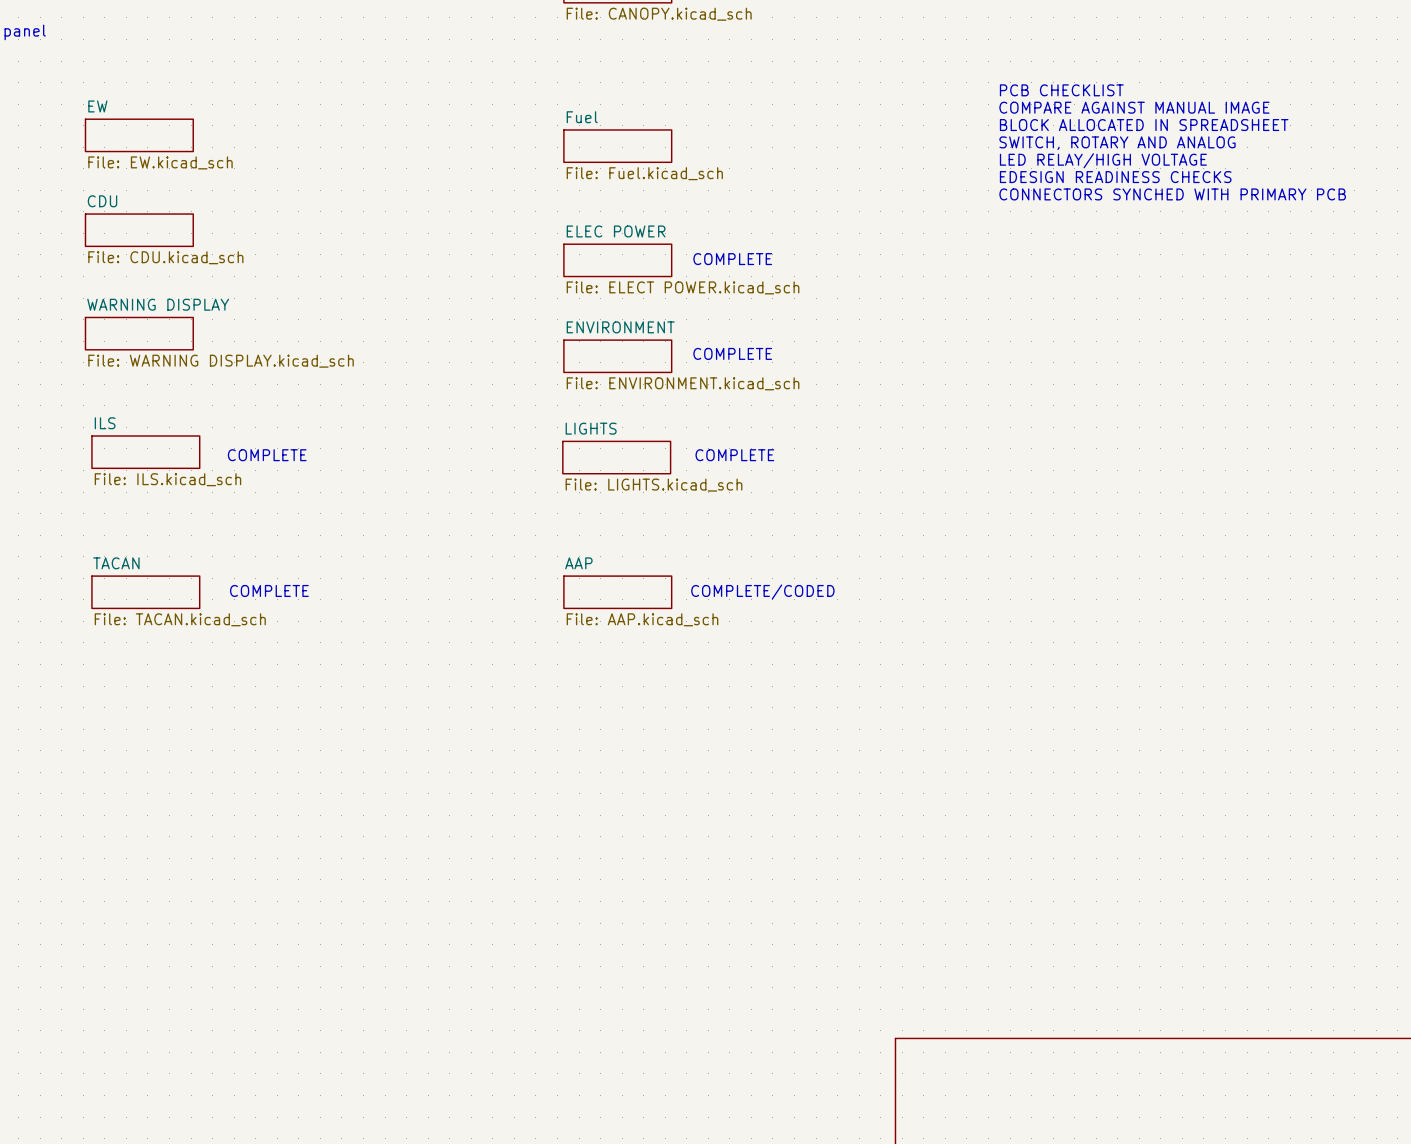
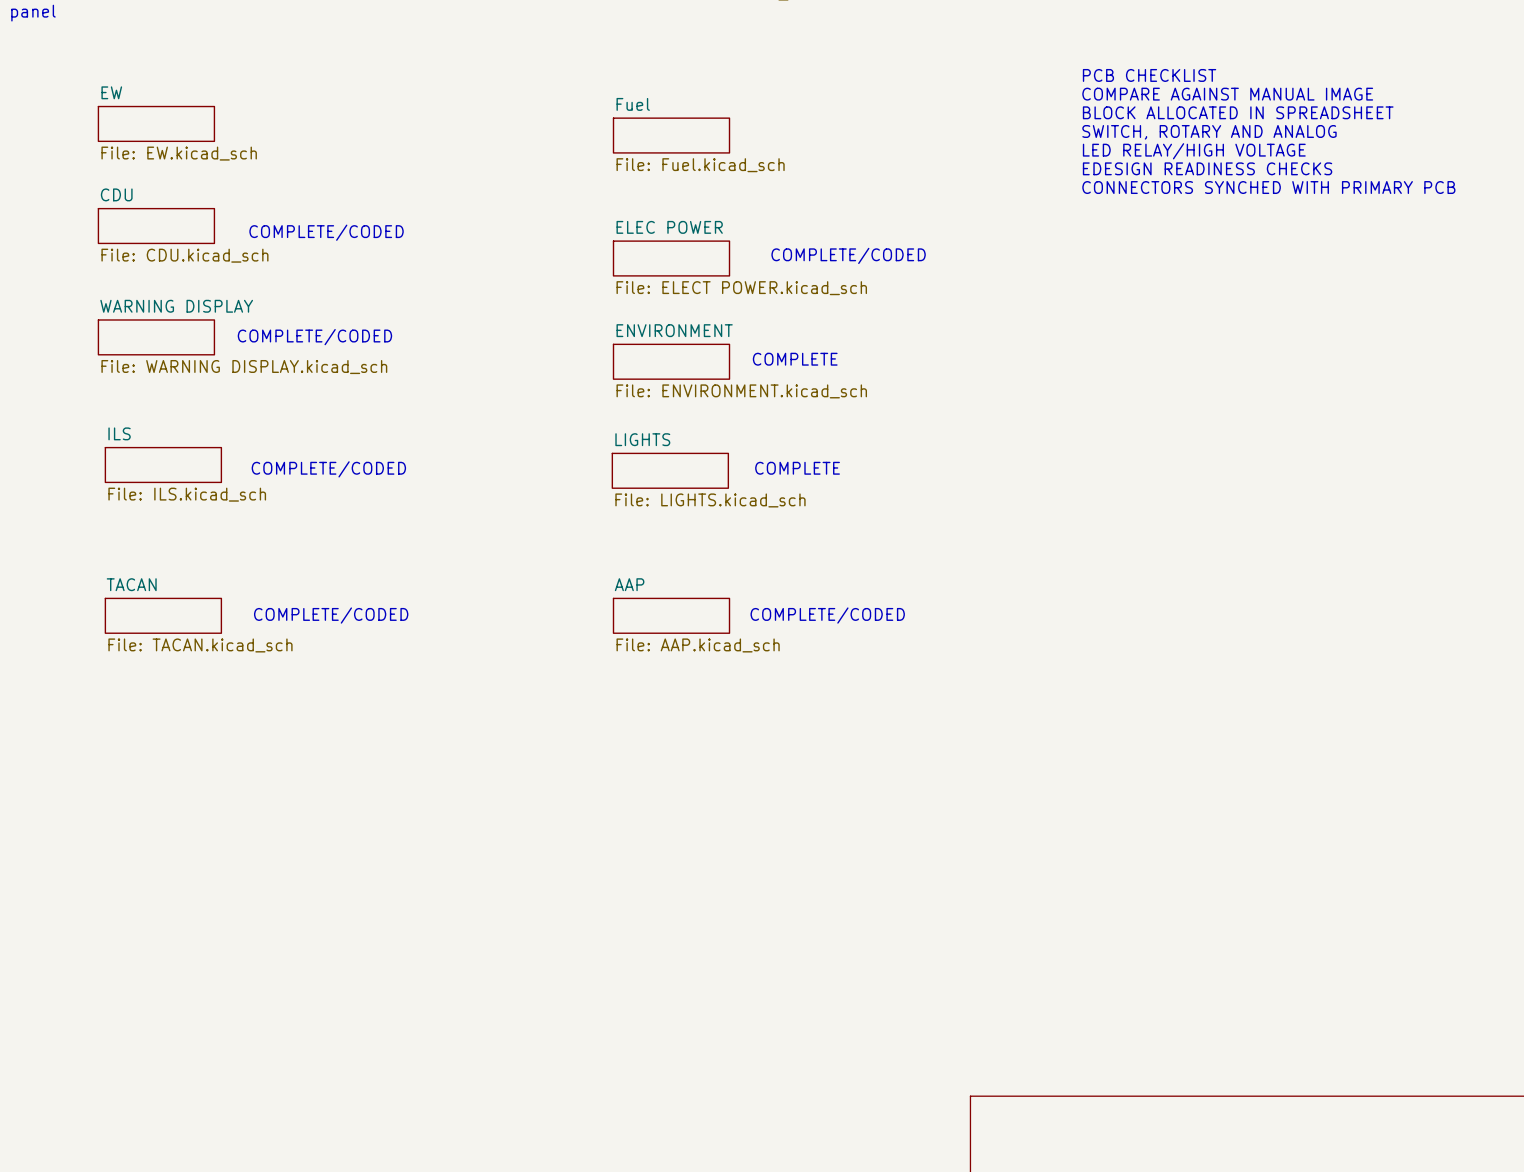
text: none -> COMPLETE/CODED (326, 232)
text: COMPLETE (732, 259) -> COMPLETE/CODED (848, 255)
text: none -> COMPLETE/CODED (314, 337)
text: COMPLETE (267, 455) -> COMPLETE/CODED (328, 469)
text: COMPLETE (269, 590) -> COMPLETE/CODED (331, 615)

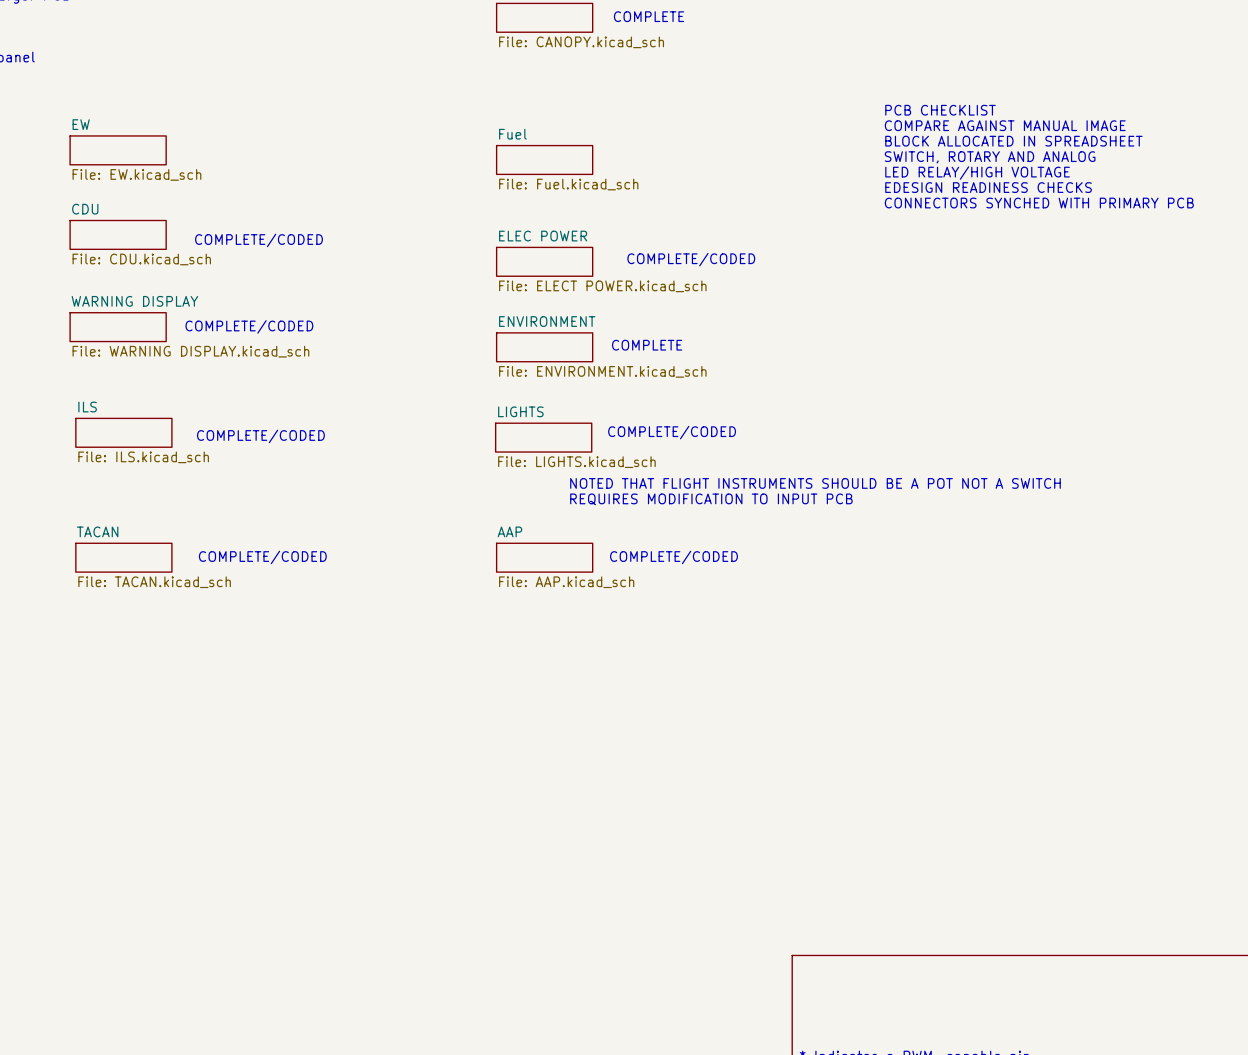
text: COMPLETE (797, 468) -> COMPLETE/CODED (672, 432)
text: none -> NOTED THAT FLIGHT INSTRUMENTS SHOULD BE A POT NOT A SWITCH (815, 483)
text: none -> REQUIRES MODIFICATION TO INPUT PCB (711, 499)

